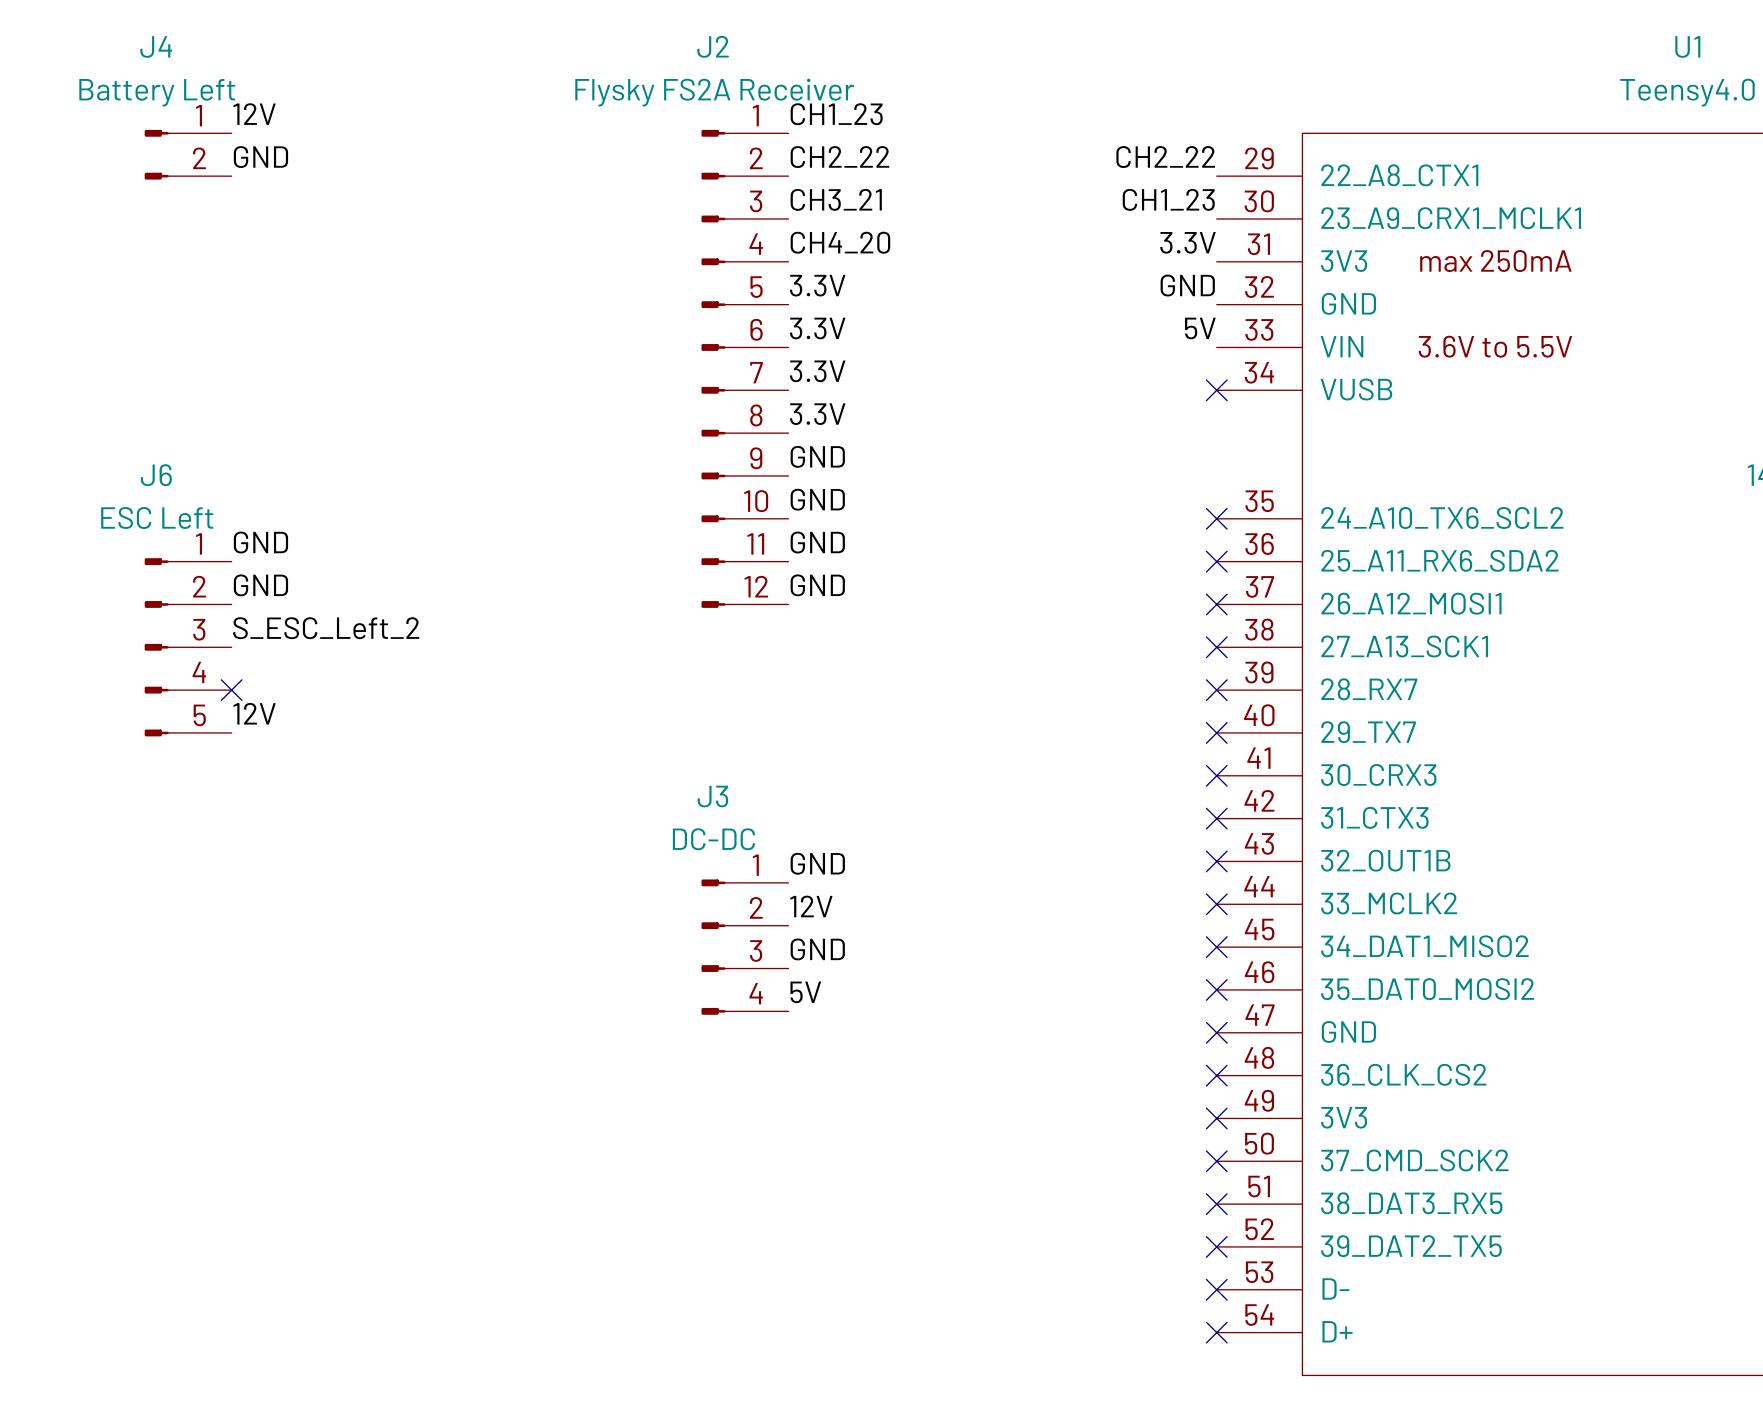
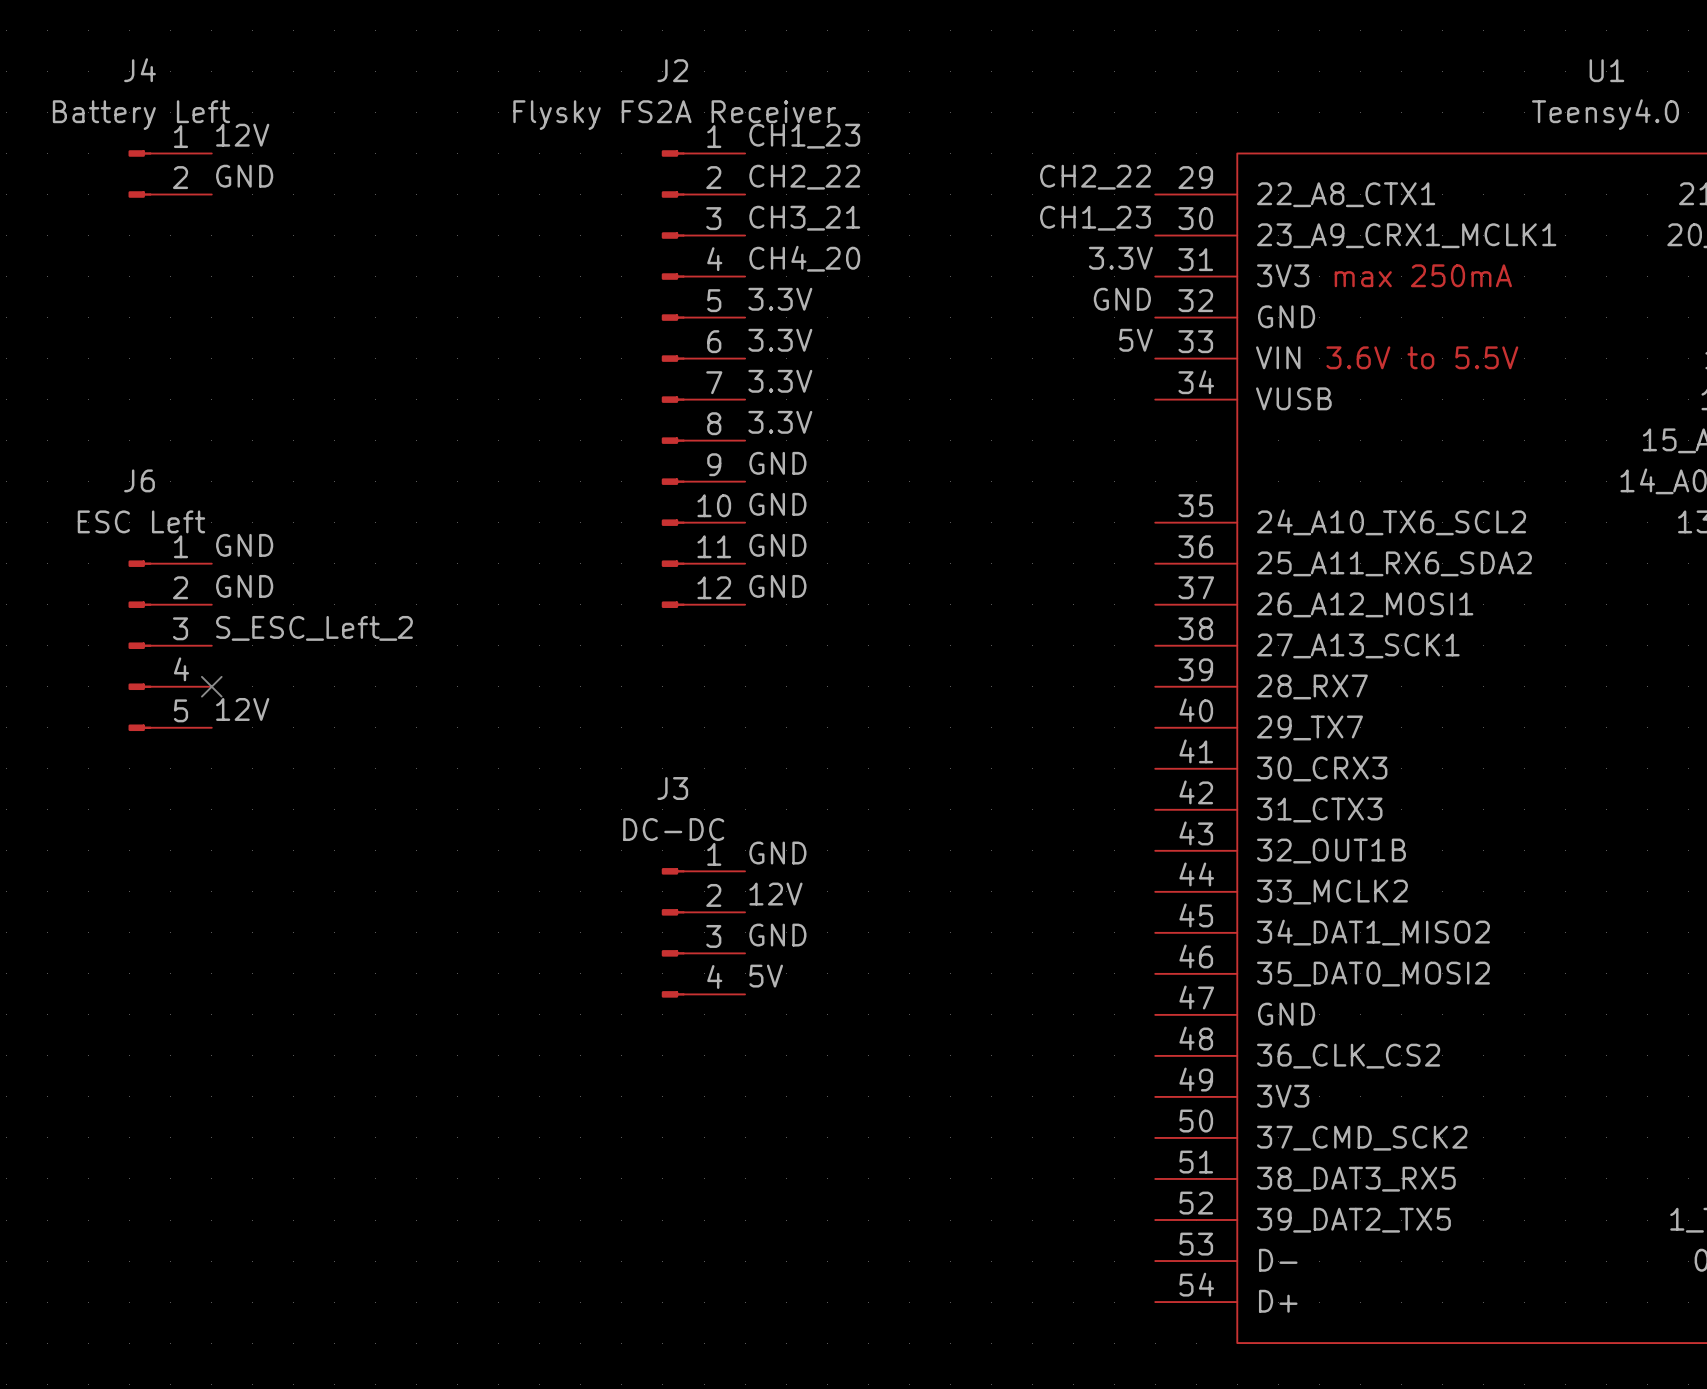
no-connect mark: (1216, 390) -> none
no-connect mark: (1216, 518) -> none
no-connect mark: (1216, 561) -> none
no-connect mark: (1216, 604) -> none
no-connect mark: (1216, 647) -> none
no-connect mark: (1216, 690) -> none
no-connect mark: (1216, 732) -> none
no-connect mark: (1216, 775) -> none
no-connect mark: (1216, 818) -> none
no-connect mark: (1216, 861) -> none
no-connect mark: (1216, 904) -> none
no-connect mark: (1216, 947) -> none
no-connect mark: (1216, 989) -> none
no-connect mark: (1216, 1032) -> none
no-connect mark: (1216, 1075) -> none
no-connect mark: (1216, 1118) -> none
no-connect mark: (1216, 1161) -> none
no-connect mark: (1216, 1204) -> none
no-connect mark: (1216, 1246) -> none
no-connect mark: (1216, 1289) -> none
no-connect mark: (1216, 1332) -> none

